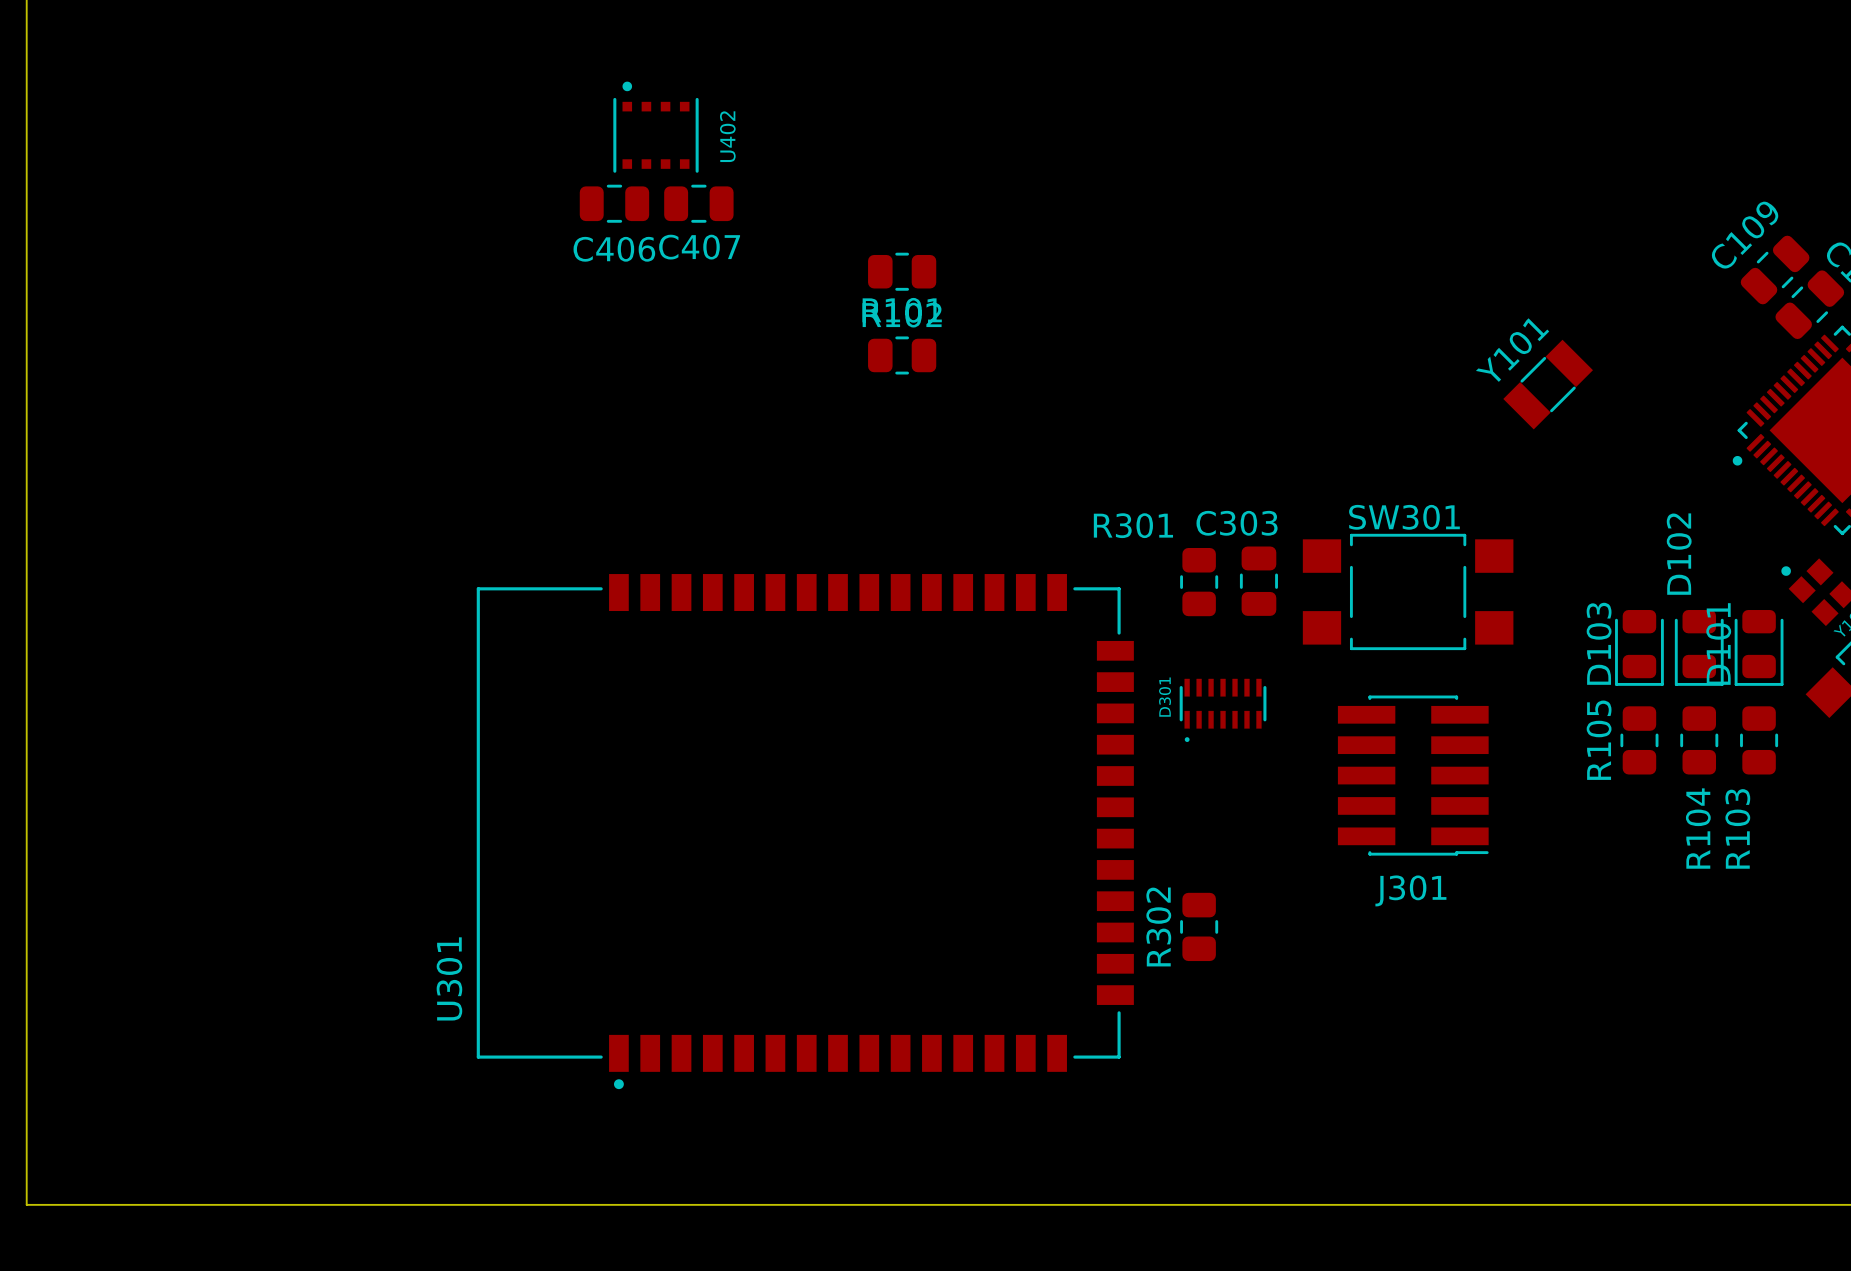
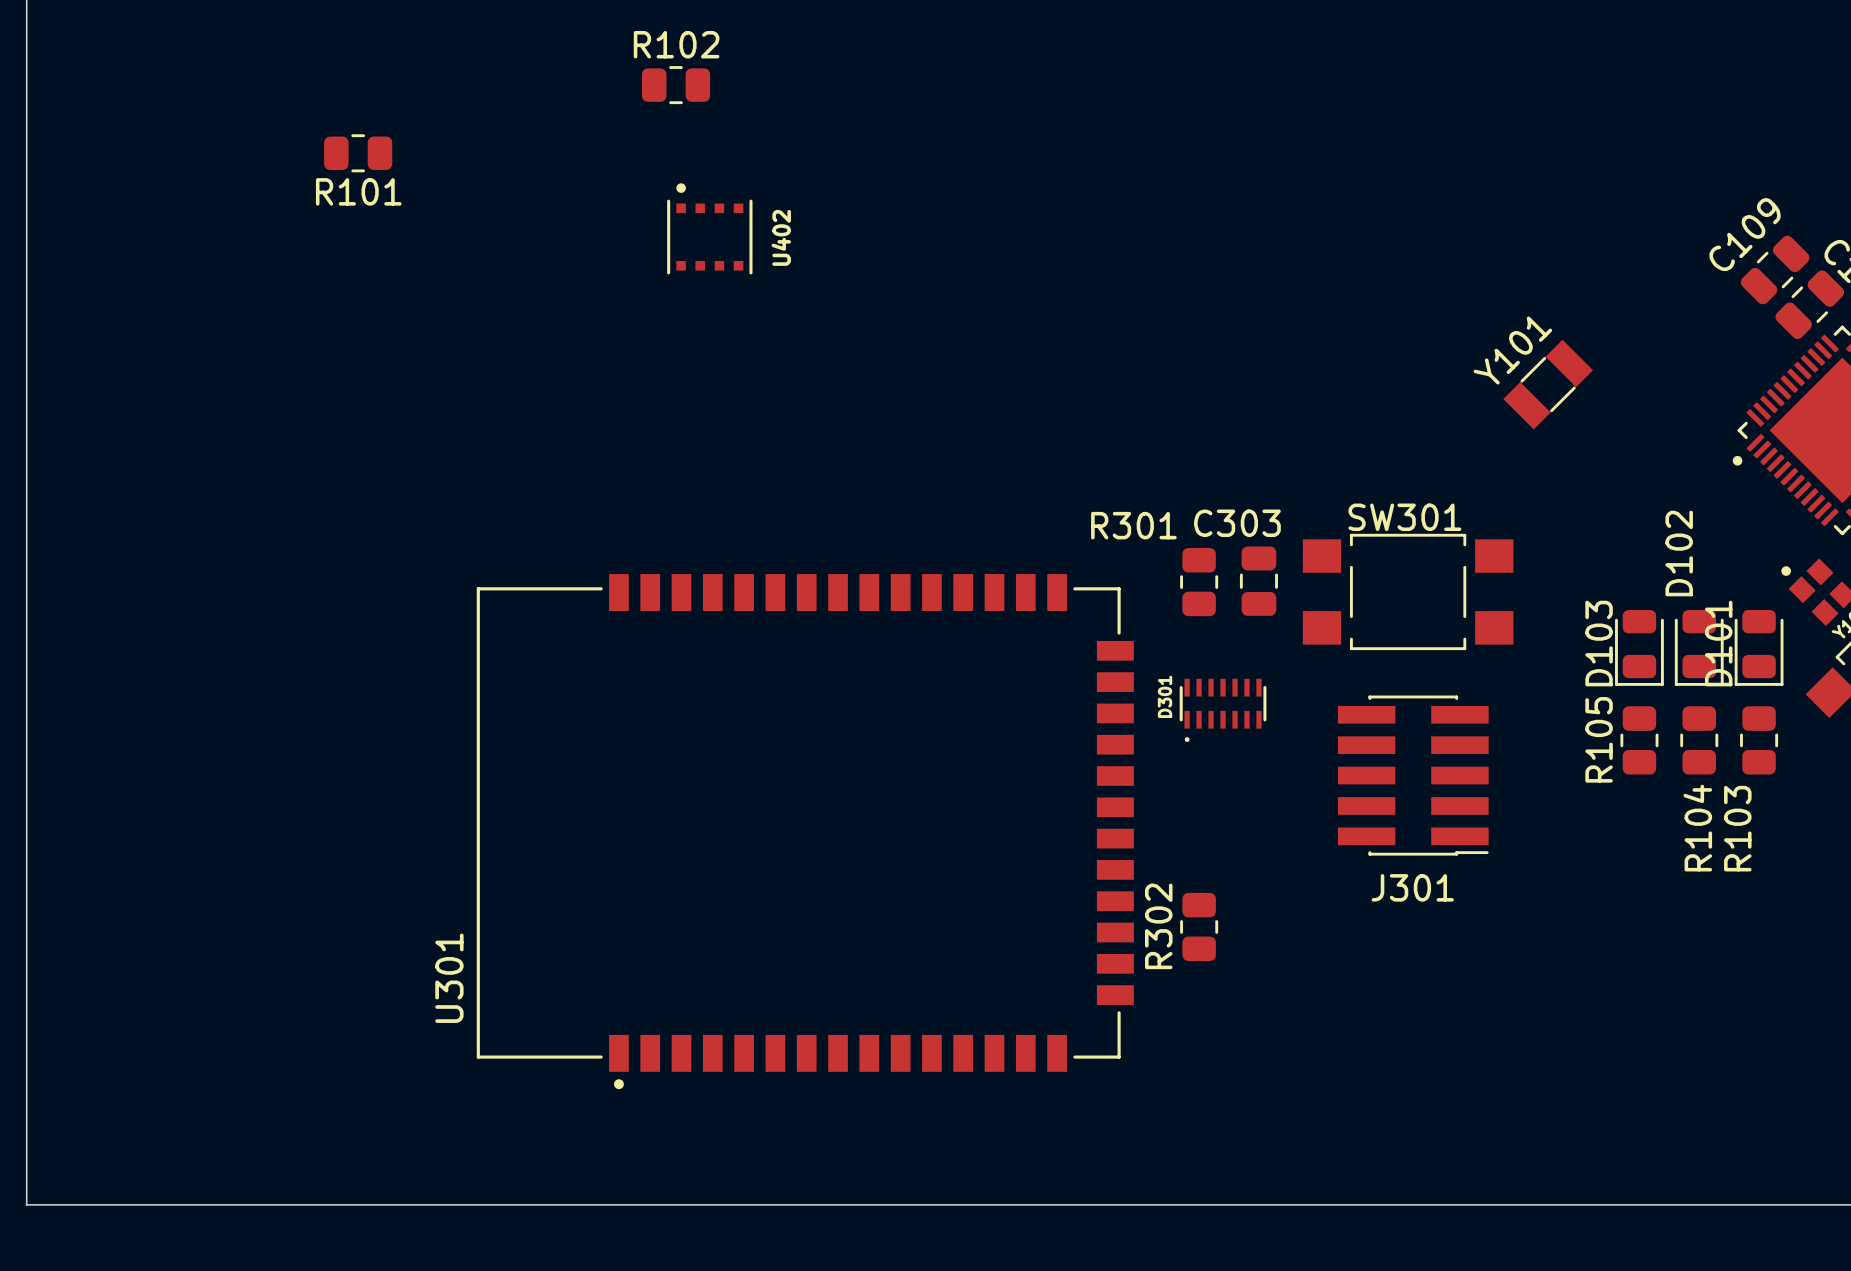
U402 position: (655, 127) -> (709, 228)
C406: (614, 203) -> none
C407: (698, 203) -> none
R101 position: (902, 271) -> (358, 153)
R102 position: (902, 355) -> (676, 85)

